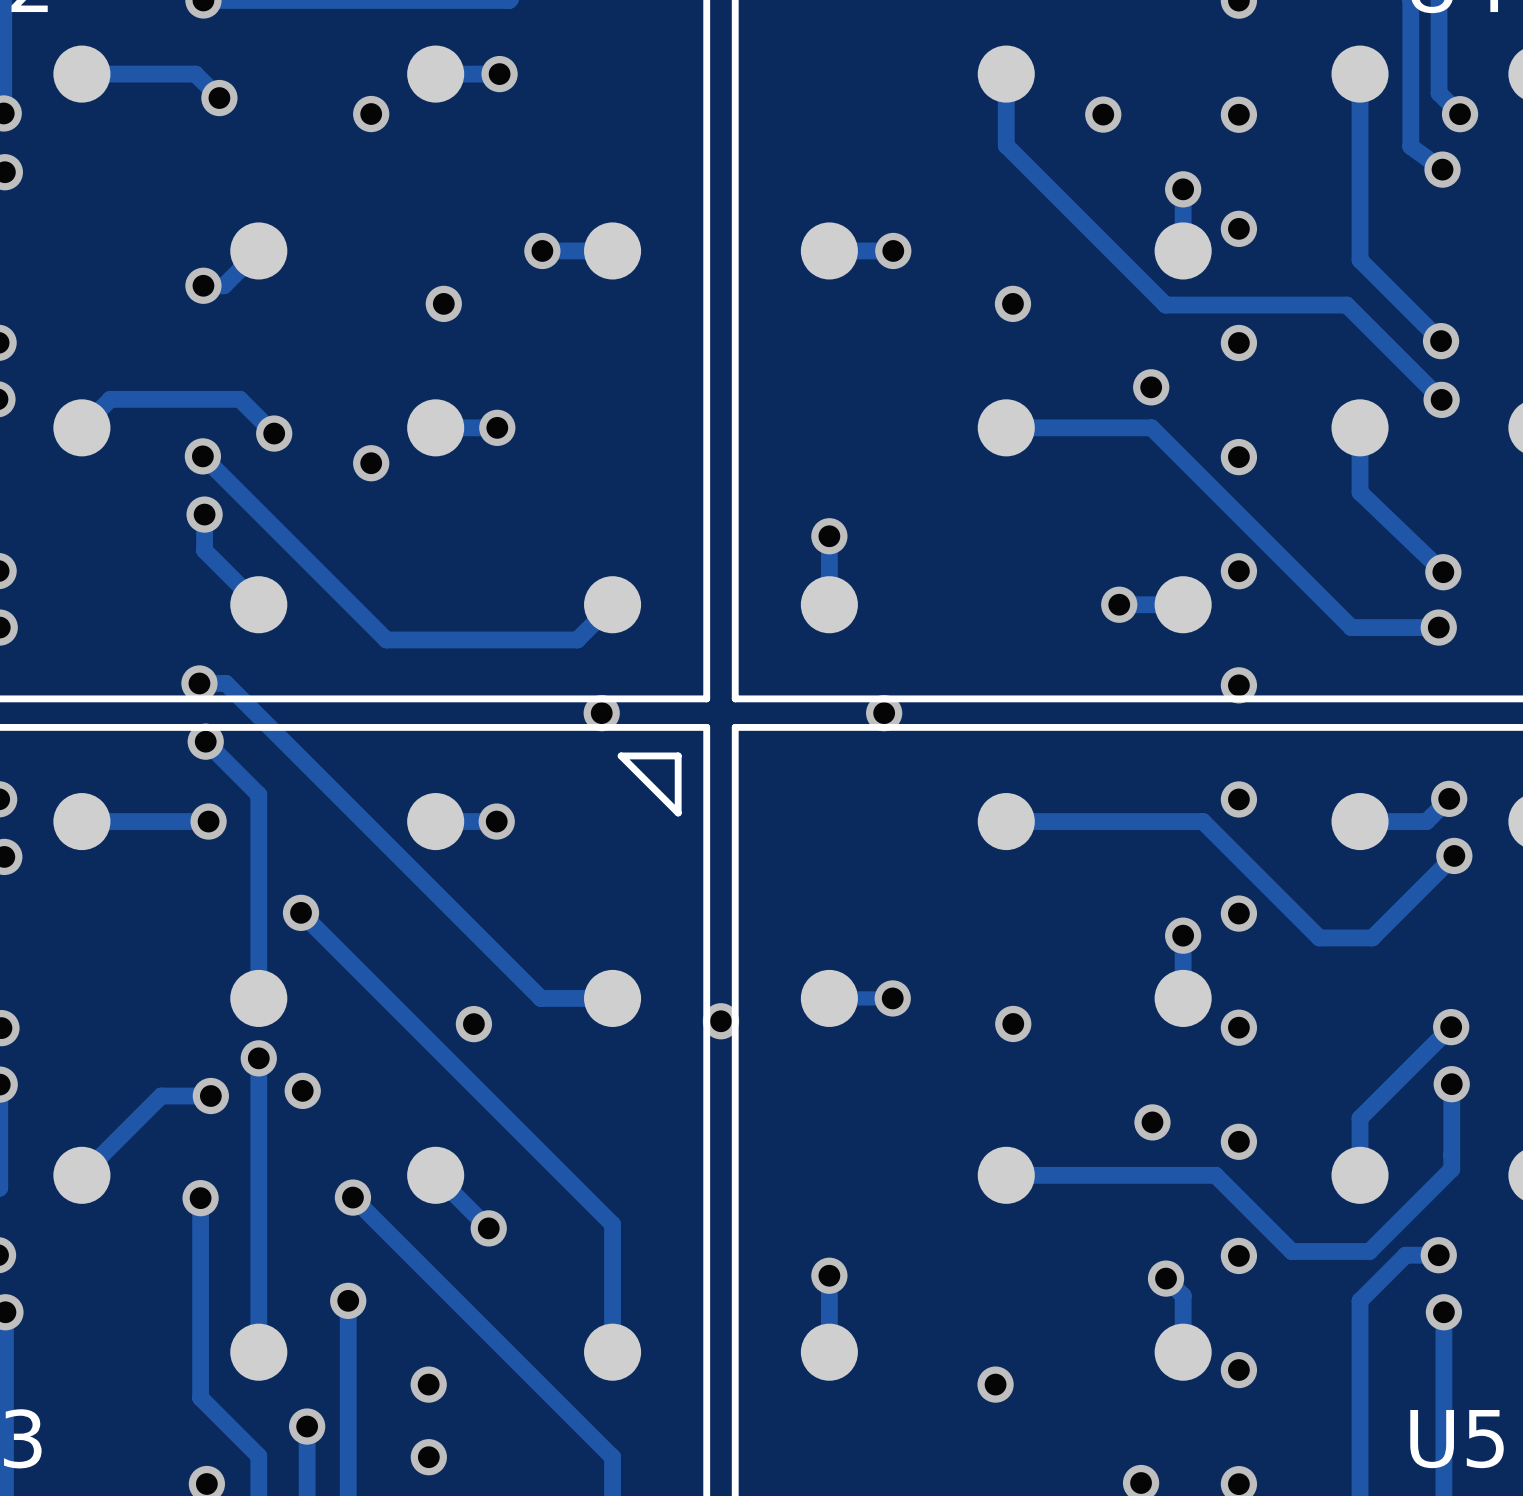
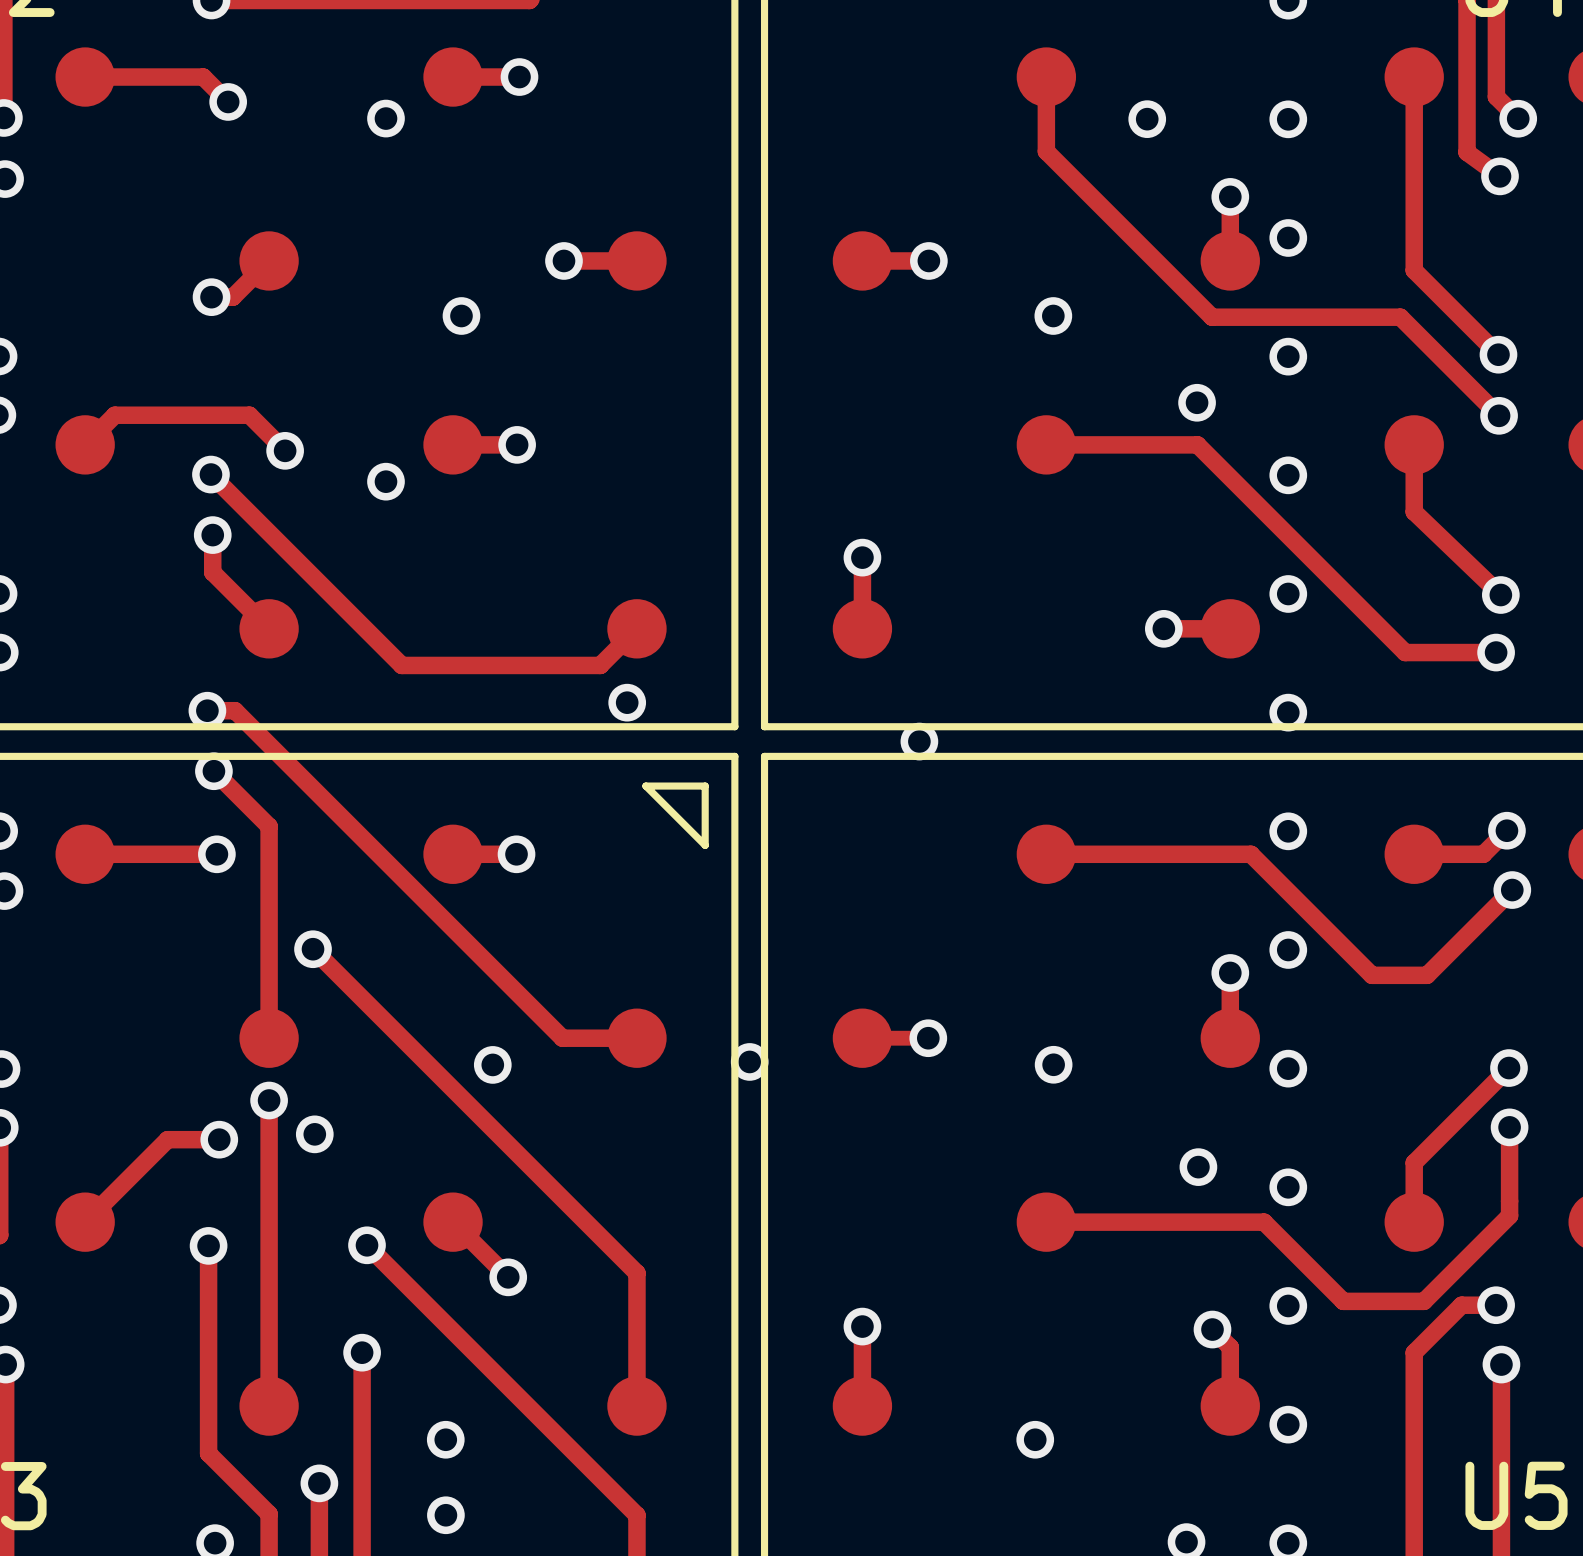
via position: (601, 713) -> (627, 702)

